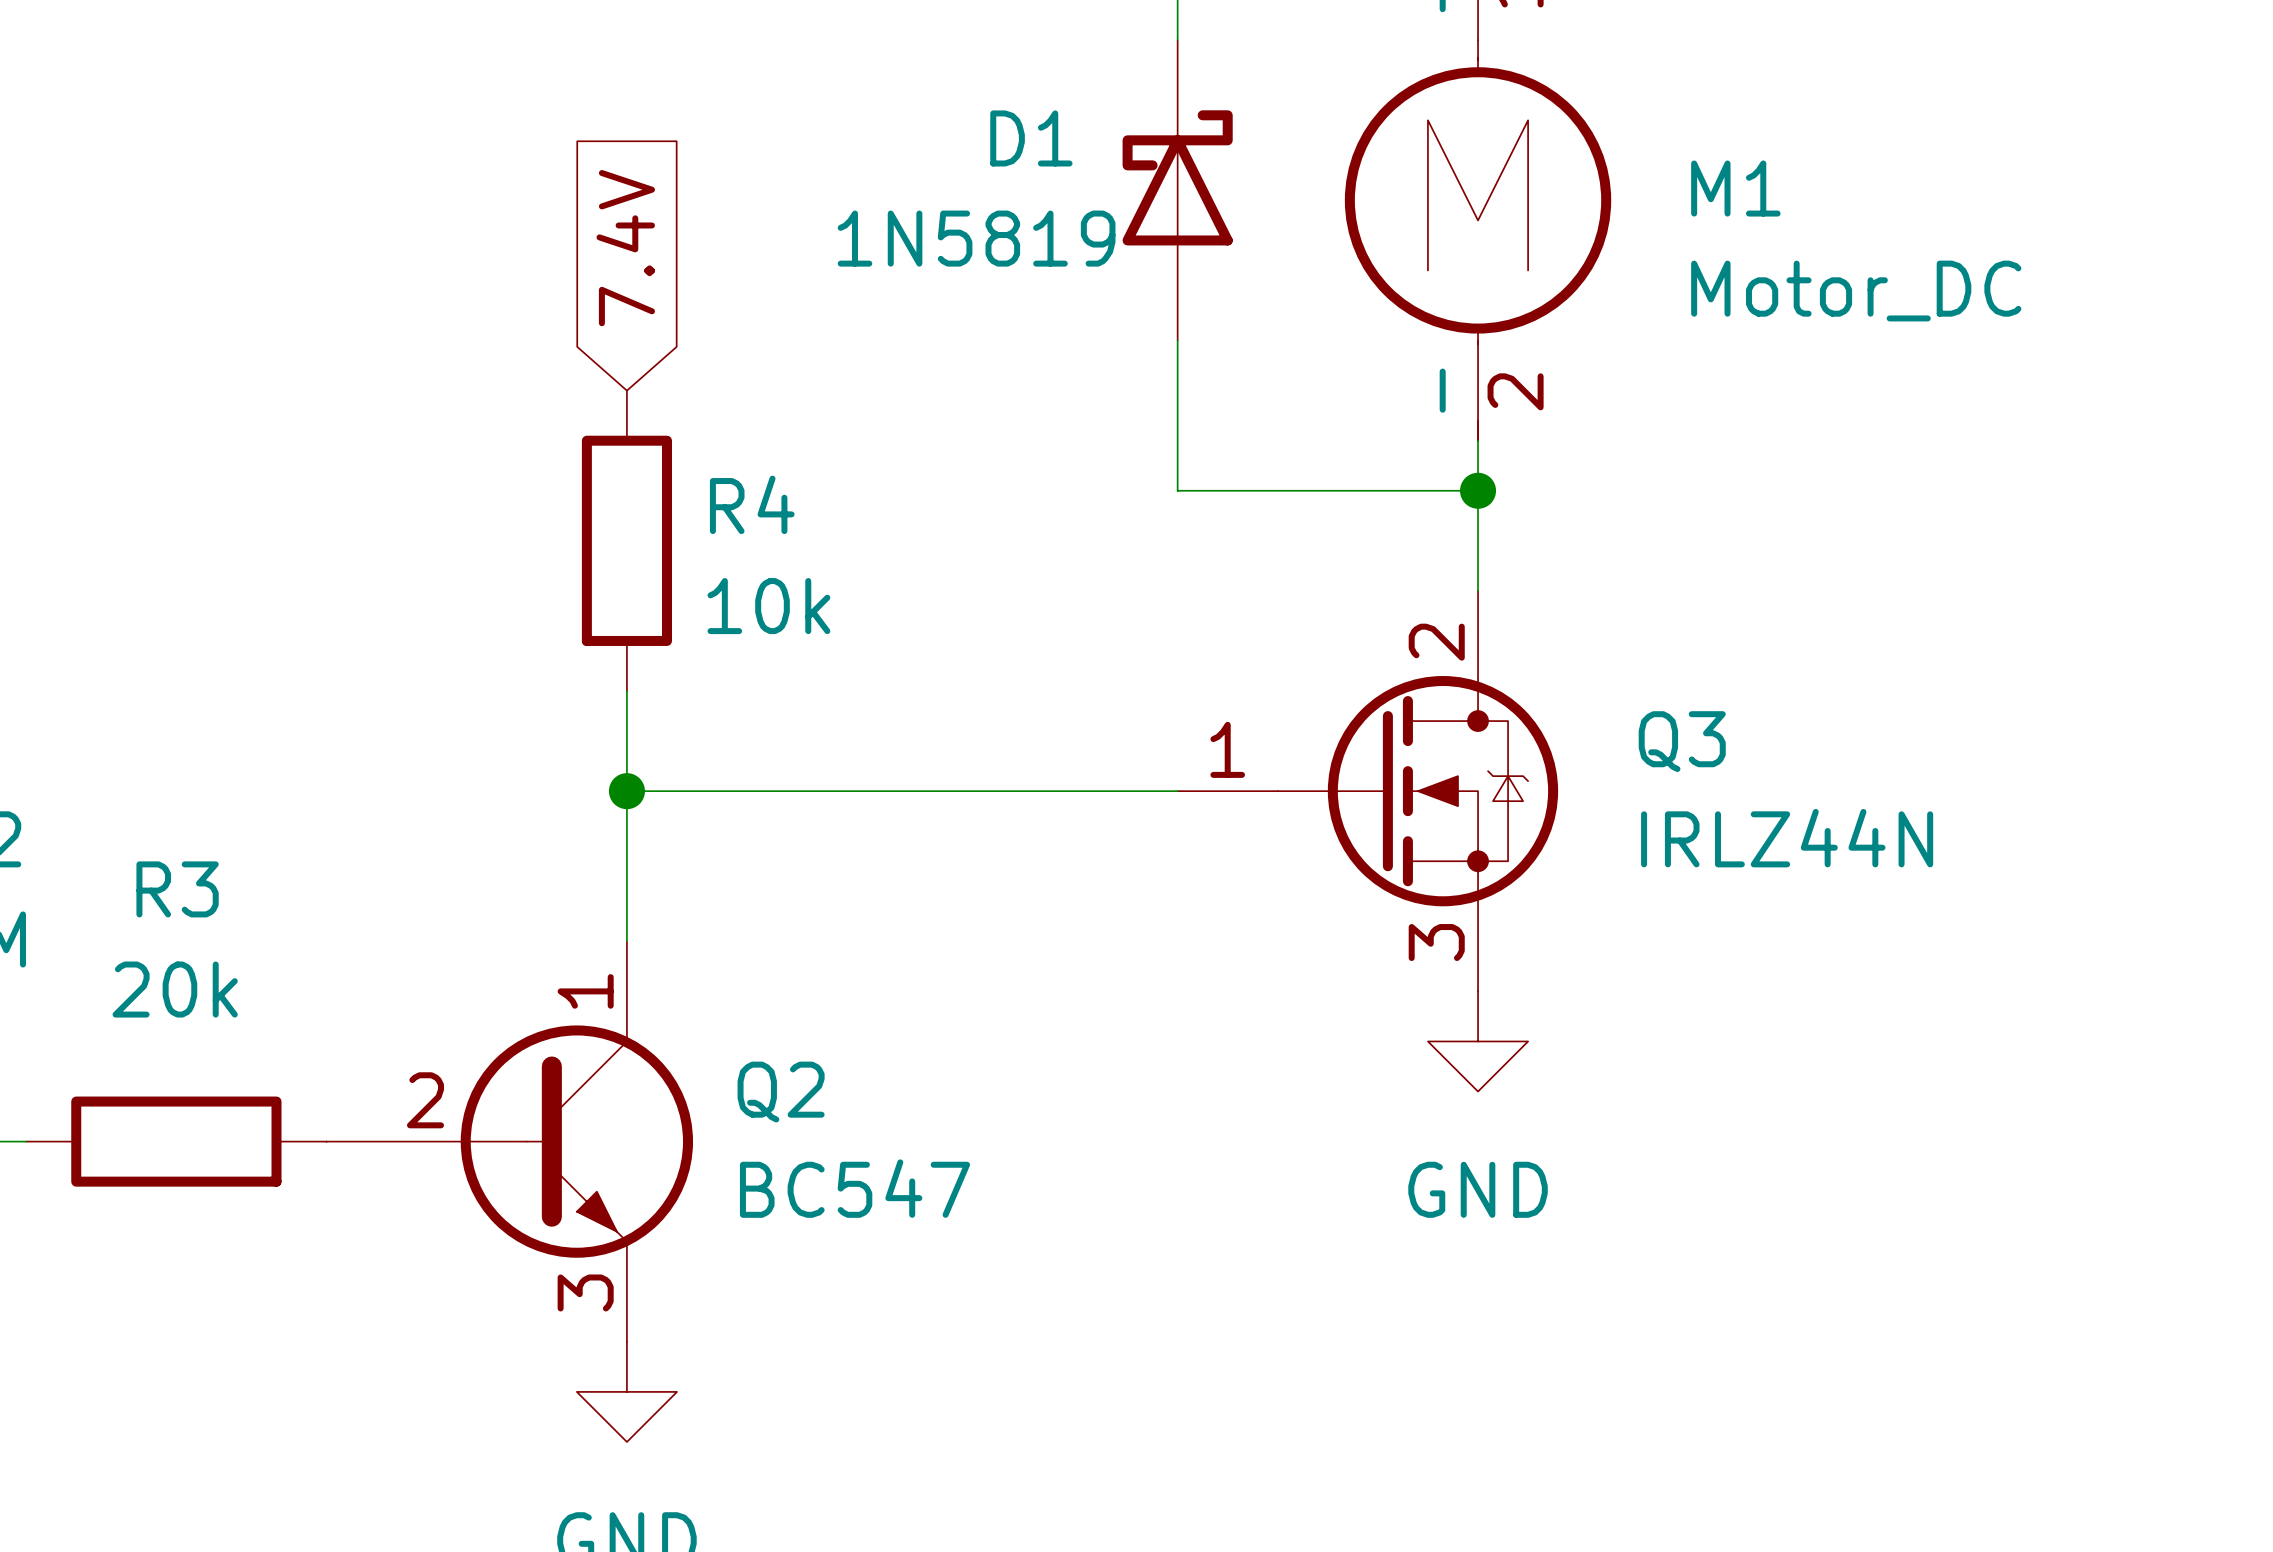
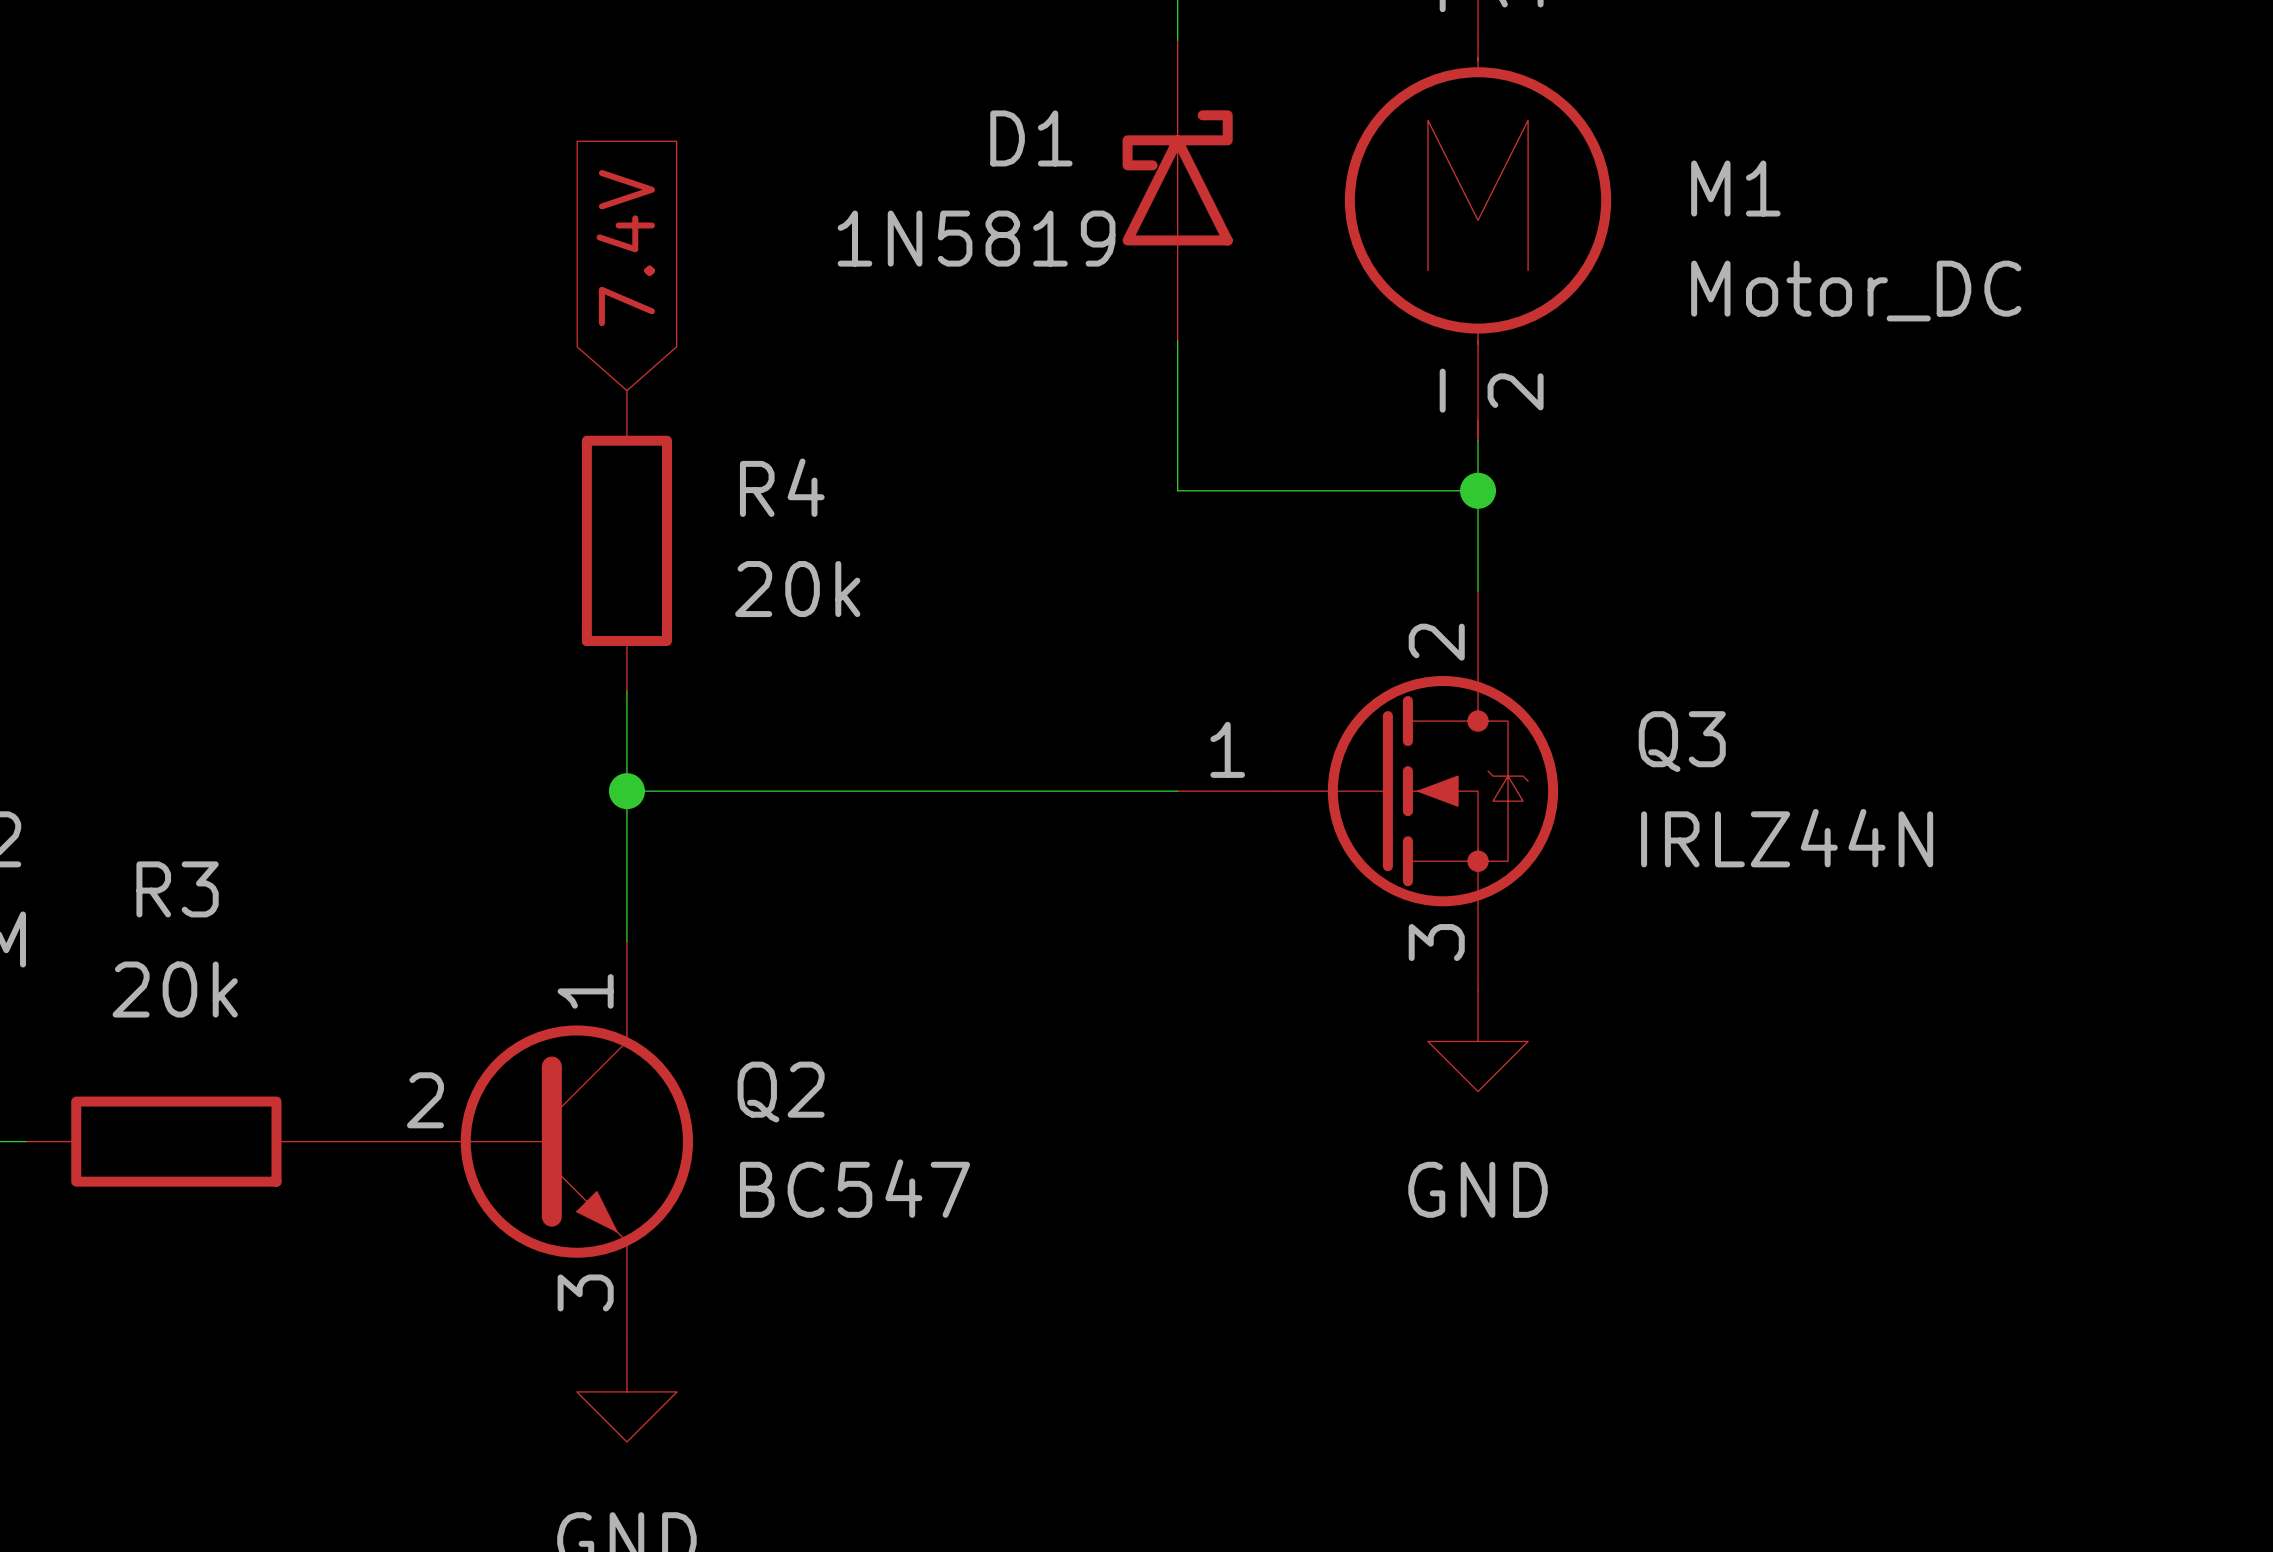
R4 name position: R4 (752, 504) -> R4 (782, 487)
R4 value: 10k (768, 606) -> 20k (797, 589)

